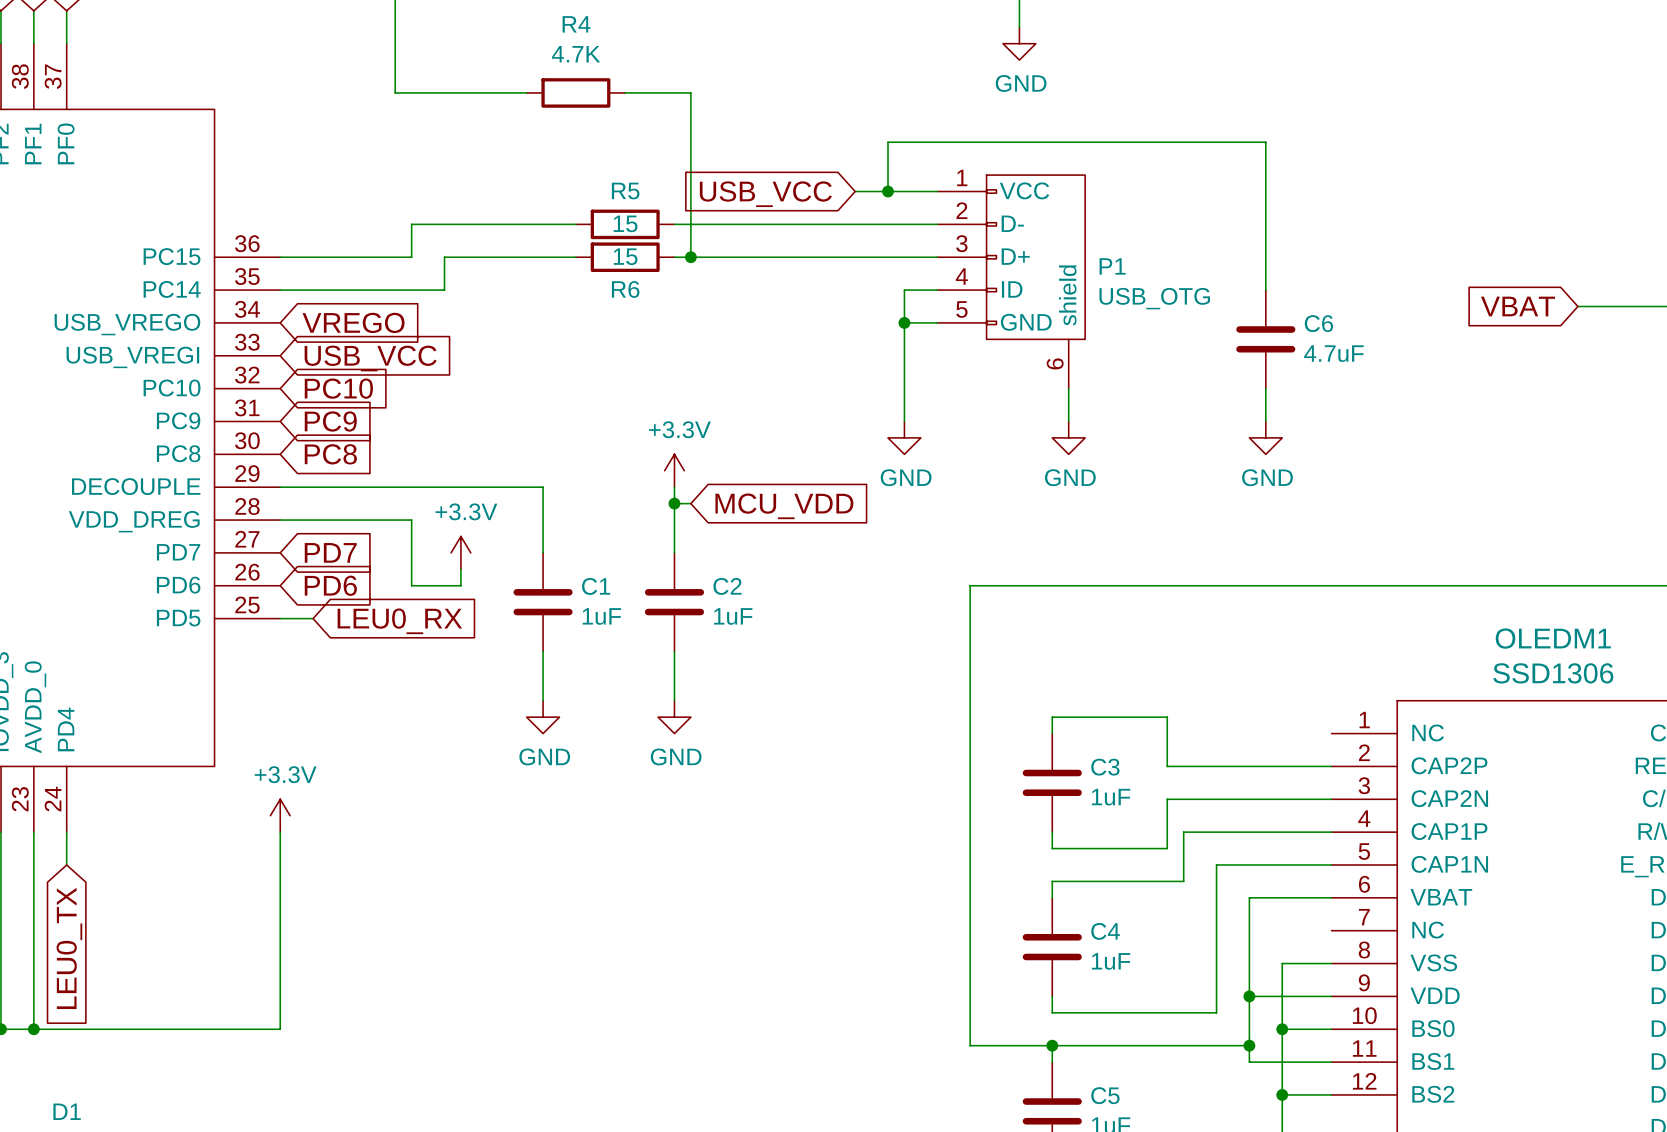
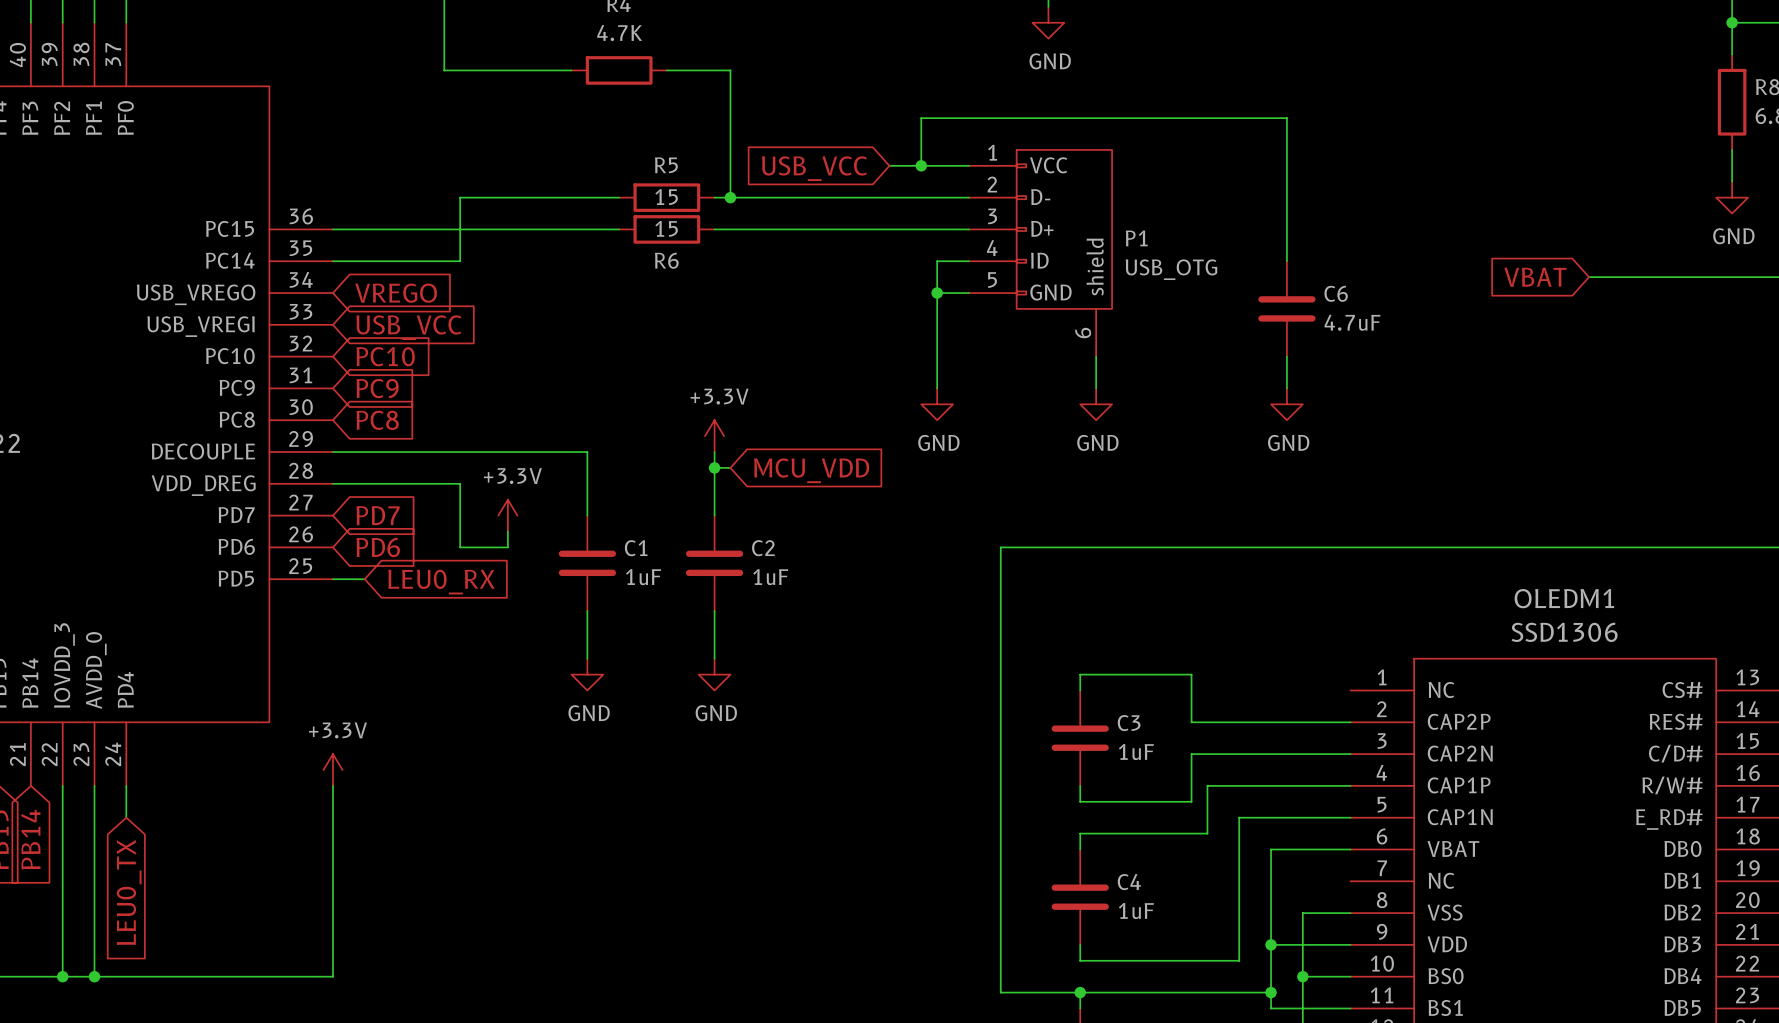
wire: (690, 224) (690, 257) -> none
wire: (444, 257) (444, 290) (411, 290) -> (491, 229) (460, 229) (460, 261)
junction position: (690, 257) -> (730, 197)

